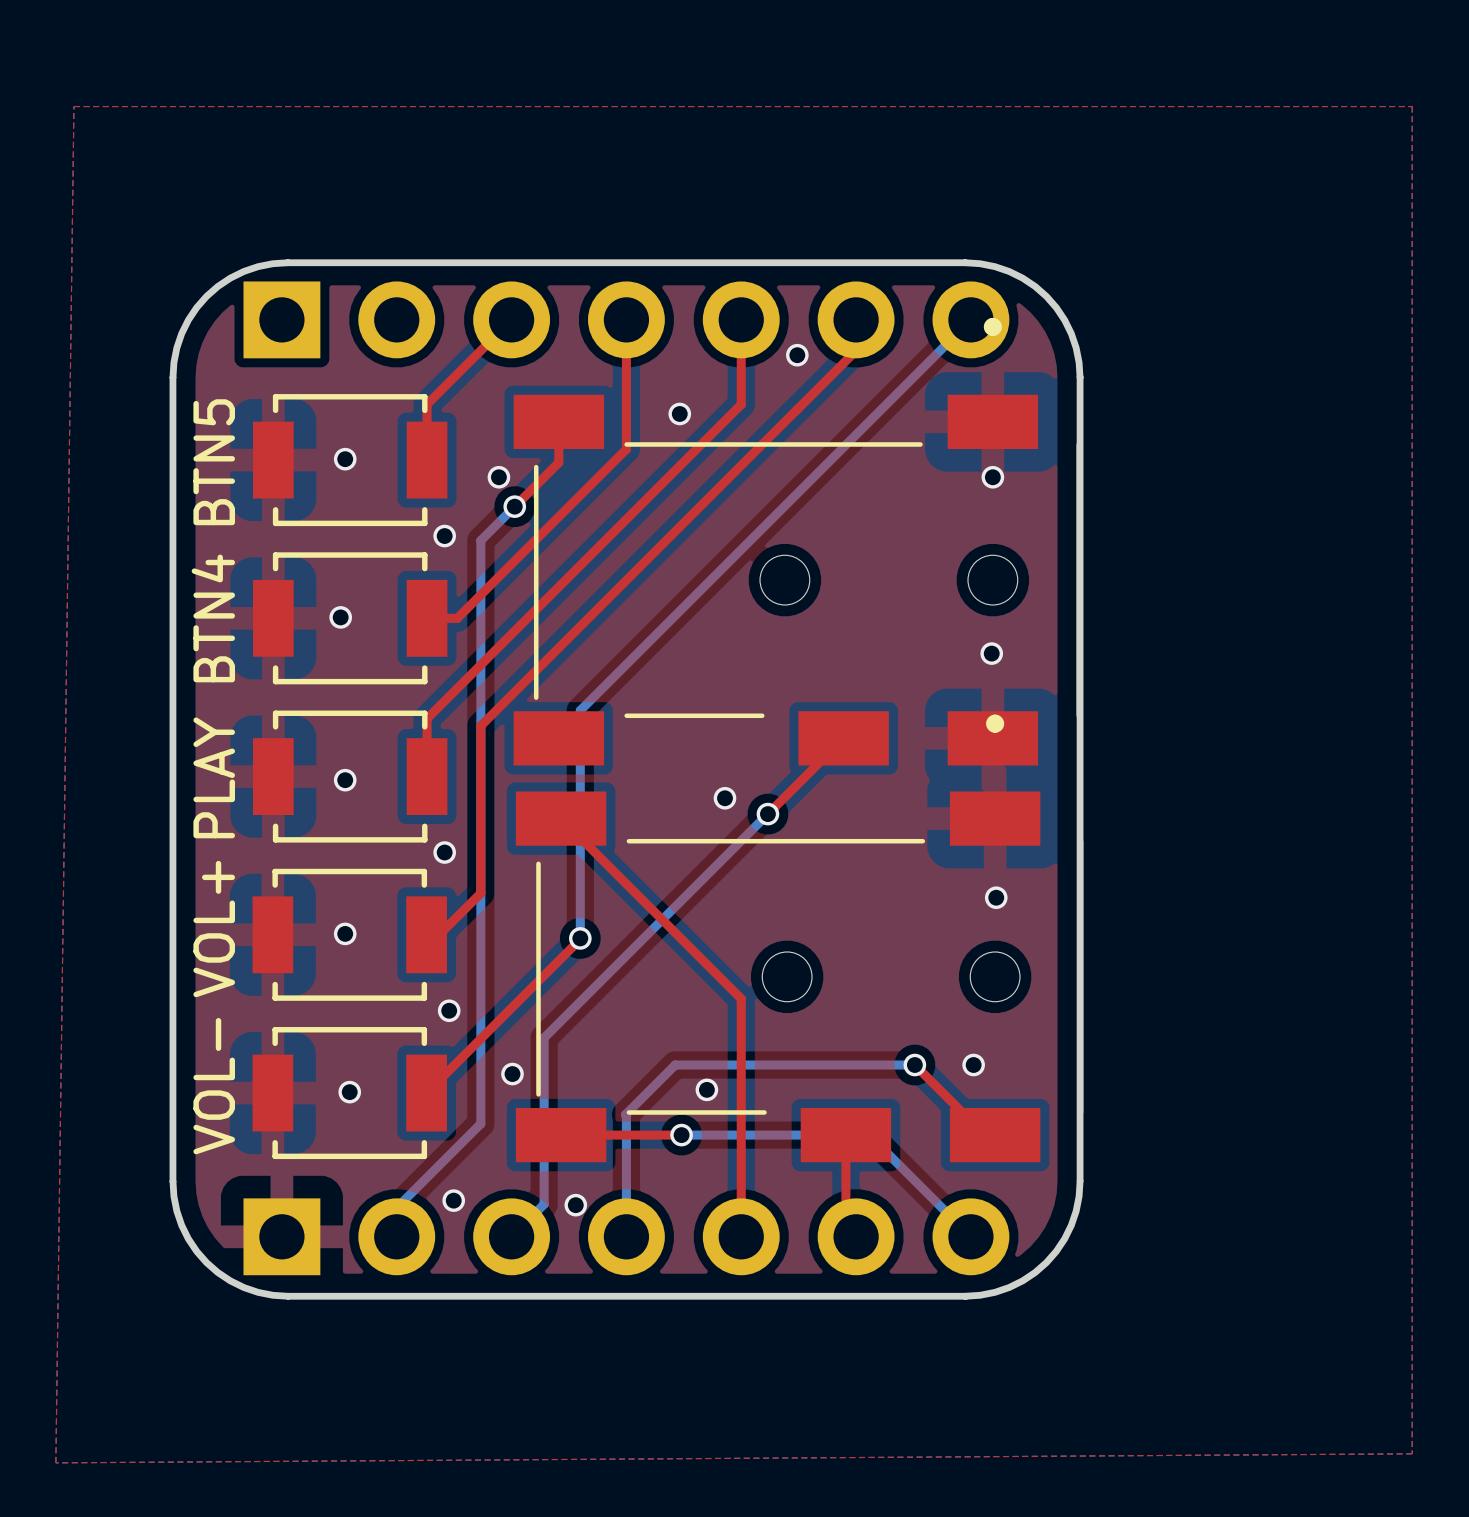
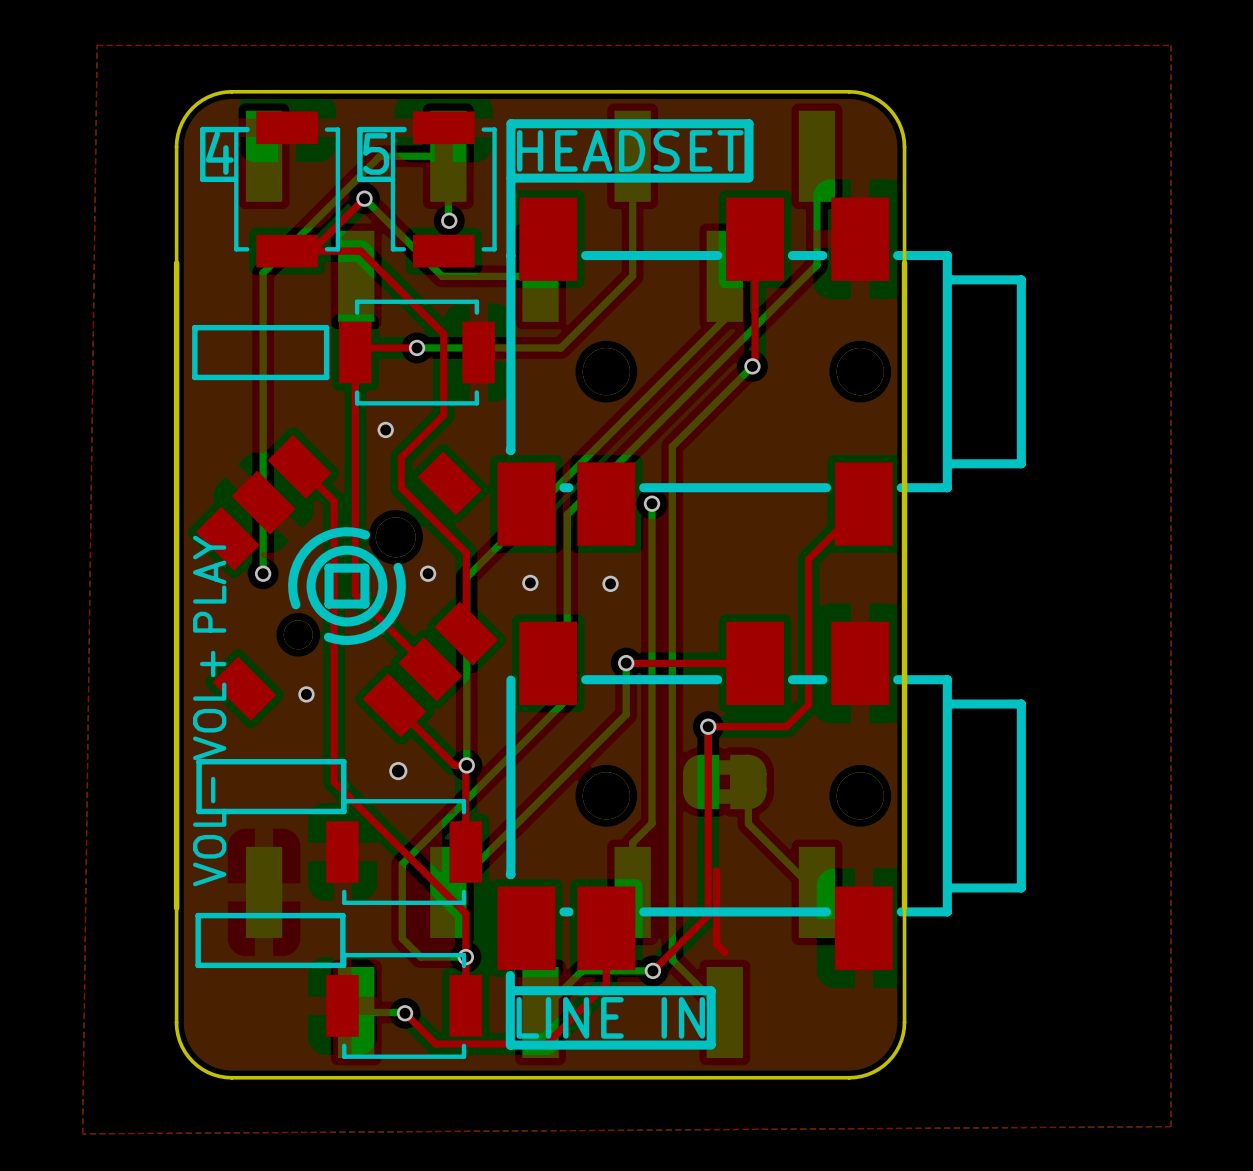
line: none -> (510, 123) (510, 255)
line: none -> (511, 123) (748, 123) (748, 177)
line: none -> (247, 129) (202, 129) (202, 179) (235, 179)
line: none -> (404, 129) (359, 129) (359, 179) (392, 179)
text: none -> HEADSET (630, 150)
text: none -> 4 (219, 153)
text: none -> 5 (376, 153)
bottom track: none -> (632, 156) (632, 276) (560, 347) (417, 347)
bottom track: none -> (816, 156) (816, 265) (567, 514) (567, 699) (402, 864) (402, 938) (420, 957) (465, 957)
line: none -> (511, 178) (748, 178)
part footprint: [243, 281, 1010, 359] -> [245, 110, 836, 322]
part: none -> (287, 189)
part: none -> (443, 189)
top track: none -> (364, 198) (313, 249) (287, 249)
bottom track: none -> (364, 198) (442, 276) (540, 276)
via: none -> (364, 198)
top track: (511, 319) (427, 404) (427, 460) -> none
top track: (626, 319) (626, 449) (457, 618) (427, 618) -> none
top track: (741, 319) (741, 404) (427, 718) (427, 776) -> none
top track: (856, 319) (856, 350) (480, 725) (480, 893) (439, 934) (426, 934) -> none
bottom track: (970, 319) (580, 710) (580, 938) -> none
bottom track: none -> (449, 220) (448, 156) (379, 156) (263, 273) (263, 573)
via: none -> (449, 220)
top track: none -> (755, 239) (755, 363) (752, 366)
via: (797, 355) -> none
top track: none -> (287, 251) (360, 251) (443, 334) (443, 415) (401, 457) (401, 488) (466, 552) (466, 633)
board edge: (172, 377) (173, 362) (181, 333) (196, 307) (206, 296) (230, 278) (243, 271) (258, 266) (287, 262) (980, 263) (1009, 271) (1022, 278) (1046, 296) (1064, 320) (1071, 333) (1079, 362) (1080, 377) -> (176, 262) (176, 147) (179, 128) (188, 112) (202, 100) (219, 93) (231, 91) (861, 93) (873, 97) (888, 107) (896, 117) (903, 134) (904, 262)
bottom track: none -> (724, 276) (724, 319) (466, 577) (466, 765)
via: (679, 413) -> none
top track: (558, 421) (558, 462) (514, 506) -> none
line: none -> (194, 327) (326, 327) (326, 377) (194, 377) (194, 327)
via: (345, 459) -> none
part: (350, 460) -> none
text: BTN5 (214, 462) -> none
via: (498, 477) -> none
via: (992, 477) -> none
top track: none -> (356, 347) (417, 347)
via: none -> (417, 347)
top track: none -> (355, 352) (355, 594) (430, 669)
part: none -> (416, 352)
bottom track: (514, 506) (480, 540) (480, 1123) (396, 1207) (396, 1236) -> none
via: (514, 506) -> none
bottom track: none -> (752, 366) (672, 446) (672, 959) (724, 1012)
via: none -> (752, 366)
part: none -> (761, 371)
via: (444, 536) -> none
part: (797, 541) -> none
via: none -> (385, 429)
via: (340, 617) -> none
text: BTN4 (213, 618) -> none
part: (350, 618) -> none
top track: none -> (299, 466) (334, 501) (334, 781) (465, 913) (465, 1005)
via: (991, 653) -> none
bottom track: none -> (652, 503) (652, 823) (632, 842) (632, 892)
via: none -> (652, 503)
top track: none -> (863, 504) (808, 559) (808, 704) (786, 726) (708, 726) (708, 915) (652, 970)
part footprint: [252, 710, 448, 843] -> [195, 434, 499, 738]
top track: (843, 738) (767, 814) -> none
via: none -> (263, 573)
via: none -> (428, 573)
via: none -> (530, 582)
via: (345, 780) -> none
via position: (724, 798) -> (610, 583)
bottom track: (767, 814) (544, 1037) (544, 1204) (511, 1236) -> none
via: (767, 814) -> none
top track: (561, 818) (741, 998) (741, 1236) -> none
via: (444, 852) -> none
top track: none -> (626, 663) (755, 663)
bottom track: none -> (626, 663) (626, 714) (448, 892)
via: none -> (626, 663)
via: (996, 897) -> none
top track: none -> (394, 705) (454, 765) (466, 765) (465, 852)
via position: (345, 933) -> (306, 694)
part: (349, 934) -> none
via: (580, 938) -> none
part: (799, 938) -> none
top track: (580, 939) (426, 1093) -> none
via: none -> (708, 726)
line: none -> (199, 761) (199, 811) (343, 811) (343, 761) (199, 761)
via: none -> (466, 765)
part: none -> (724, 781)
bottom track: none -> (748, 781) (748, 823) (816, 892)
part: none -> (761, 795)
top track: (914, 1065) (984, 1135) (995, 1135) -> none
bottom track: (914, 1065) (675, 1065) (625, 1114) (626, 1236) -> none
via: (914, 1065) -> none
via: (973, 1065) -> none
via: (512, 1074) -> none
via: (706, 1089) -> none
via: (349, 1092) -> none
part: (349, 1093) -> none
part: none -> (404, 852)
top track: (561, 1135) (681, 1135) -> none
bottom track: (681, 1135) (869, 1135) (970, 1236) -> none
via: (681, 1135) -> none
board edge: (172, 1181) (173, 1196) (181, 1225) (188, 1238) (206, 1262) (230, 1280) (243, 1287) (258, 1292) (287, 1296) -> (176, 908) (177, 1034) (184, 1051) (192, 1061) (207, 1072) (219, 1076) (849, 1077) (861, 1076) (878, 1069) (892, 1056) (901, 1040) (904, 1022) (904, 907)
board edge: (1080, 1181) (1076, 1211) (1071, 1225) (1064, 1238) (1046, 1262) (1035, 1272) (1009, 1287) (994, 1292) (965, 1296) -> none
line: none -> (198, 915) (198, 965) (342, 965) (342, 915) (198, 915)
part footprint: [243, 1198, 1010, 1276] -> [245, 846, 836, 1059]
via: (453, 1200) -> none
via: (575, 1205) -> none
top track: none -> (606, 928) (606, 984) (546, 1044) (435, 1044) (405, 1013)
via: none -> (465, 957)
bottom track: none -> (652, 970) (582, 970) (540, 1012)
via: none -> (652, 970)
line: none -> (510, 975) (510, 1045)
line: none -> (510, 990) (711, 990)
line: none -> (711, 991) (711, 1044)
board edge: (288, 1296) (965, 1296) -> none
part: none -> (404, 1005)
bottom track: none -> (356, 1012) (405, 1013)
via: none -> (405, 1013)
text: none -> LINE IN (610, 1017)
line: none -> (510, 1045) (711, 1045)

